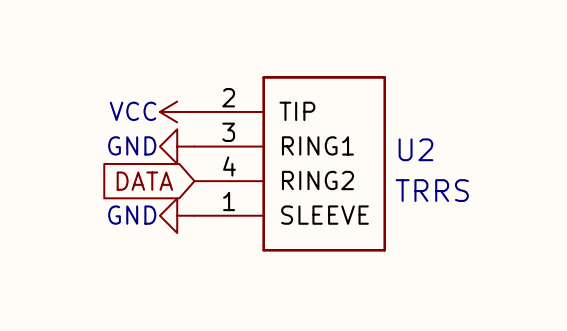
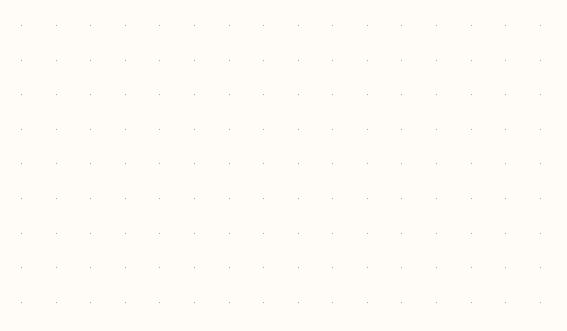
power symbol: VCC (177, 111) -> none
power symbol: GND (177, 146) -> none
U2: TRRS (289, 163) -> none
global label: DATA (144, 181) -> none
power symbol: GND (177, 215) -> none

